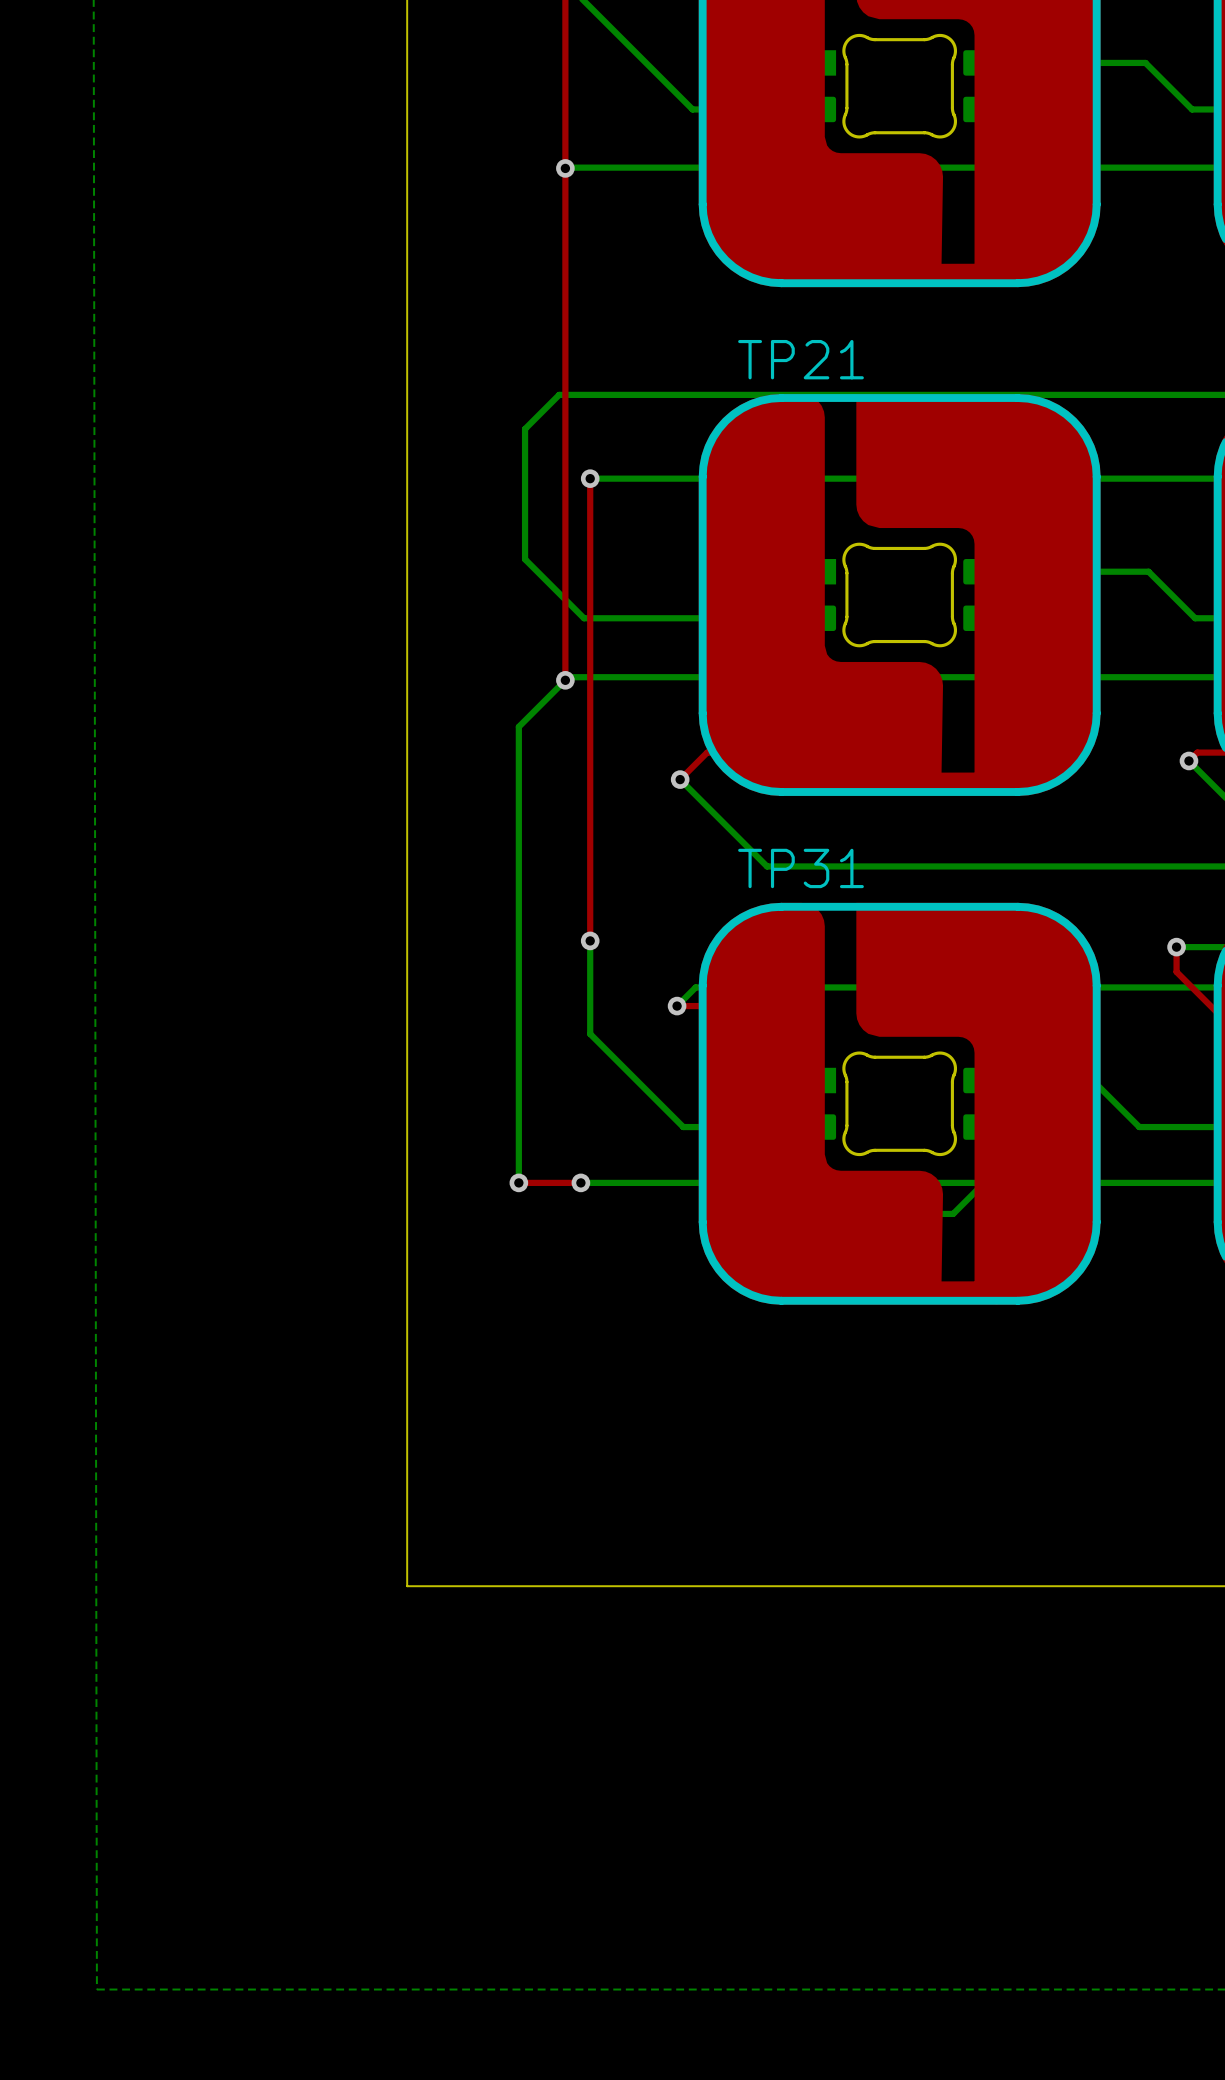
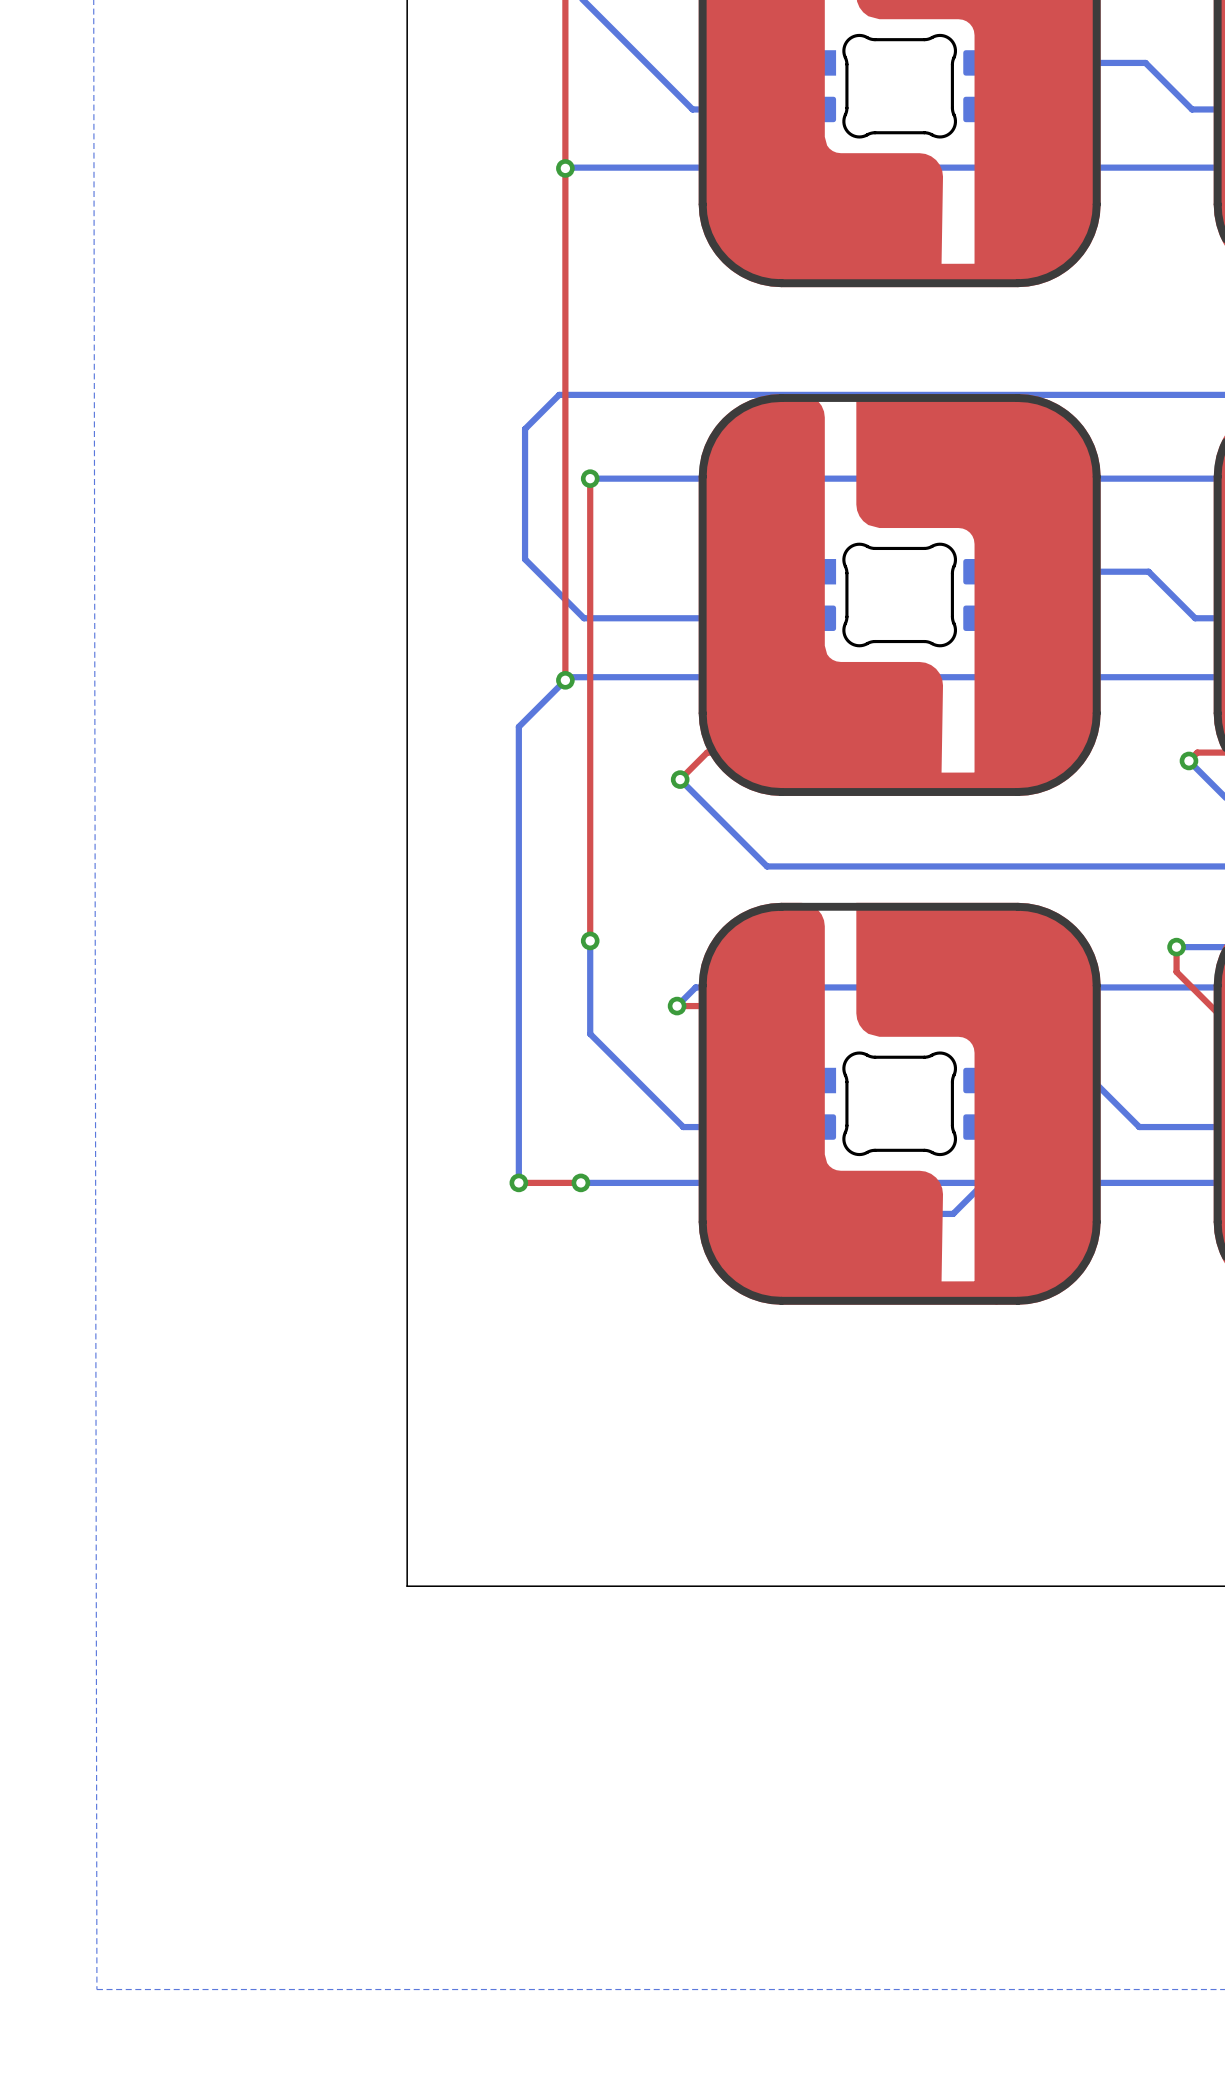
TP21 name: TP21 (800, 359) -> none
TP31 name: TP31 (800, 868) -> none

